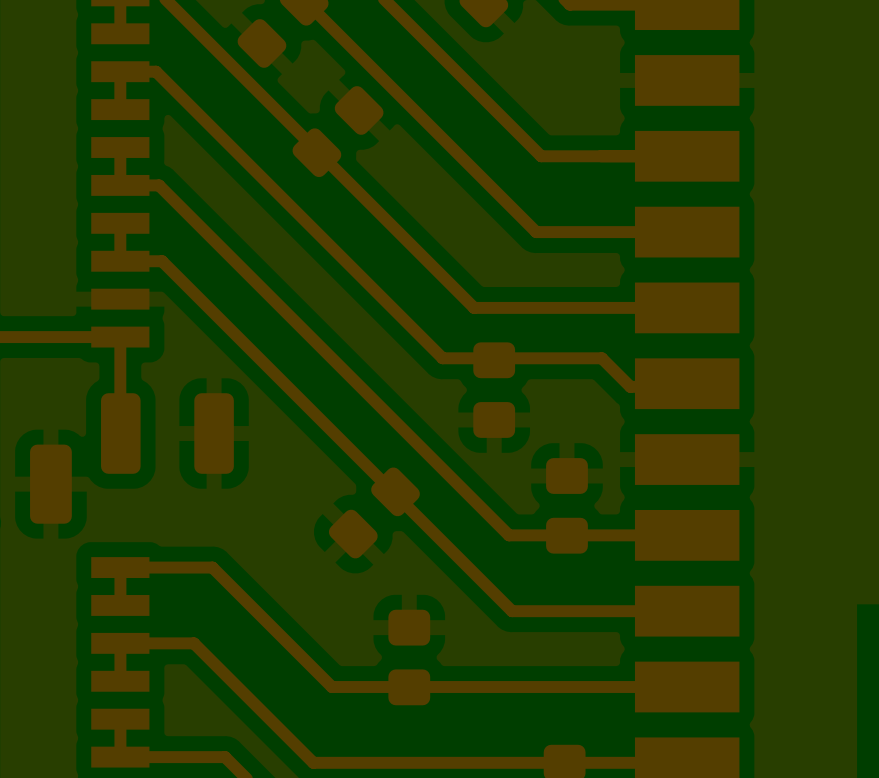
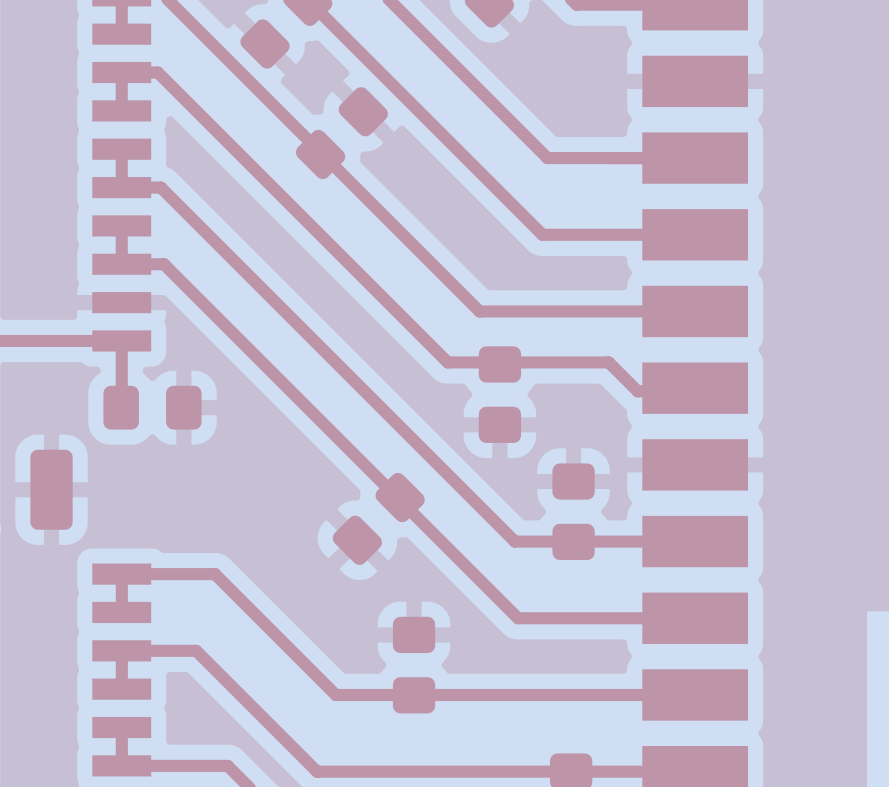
part: none -> (152, 407)
part: (167, 433) -> none

